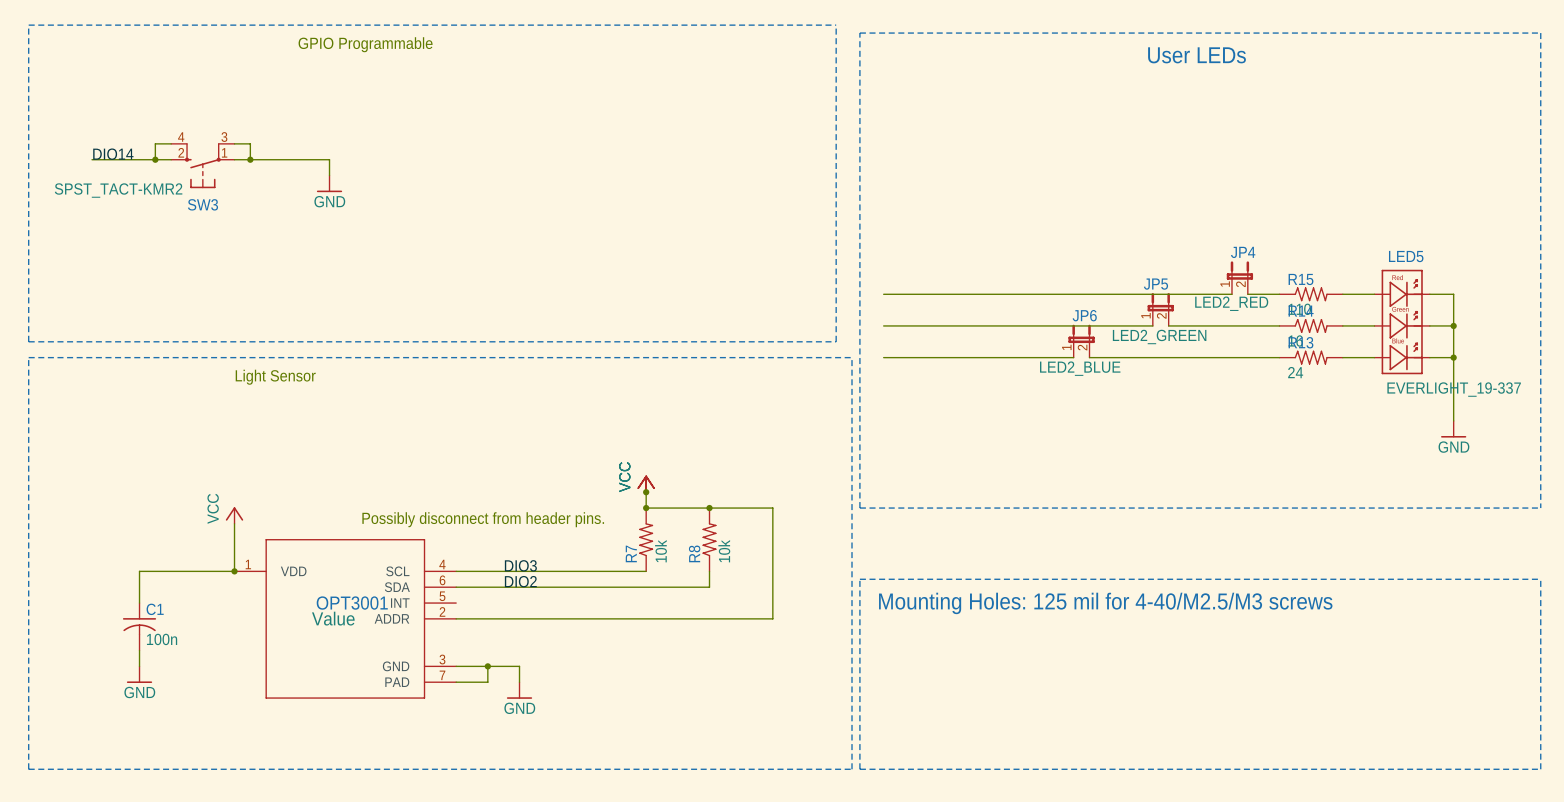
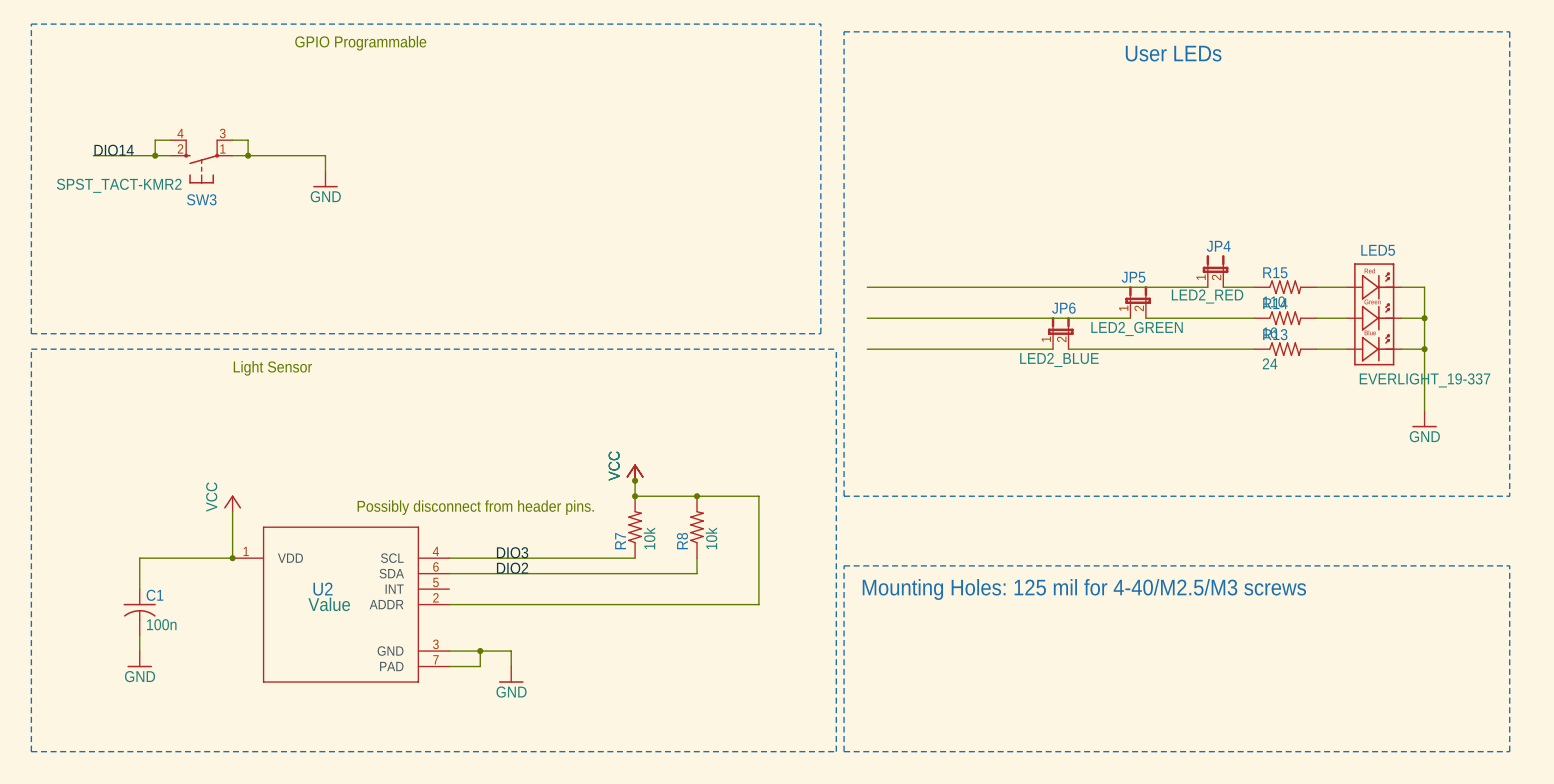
OPT3001 name: OPT3001 (352, 603) -> U2 (323, 589)

